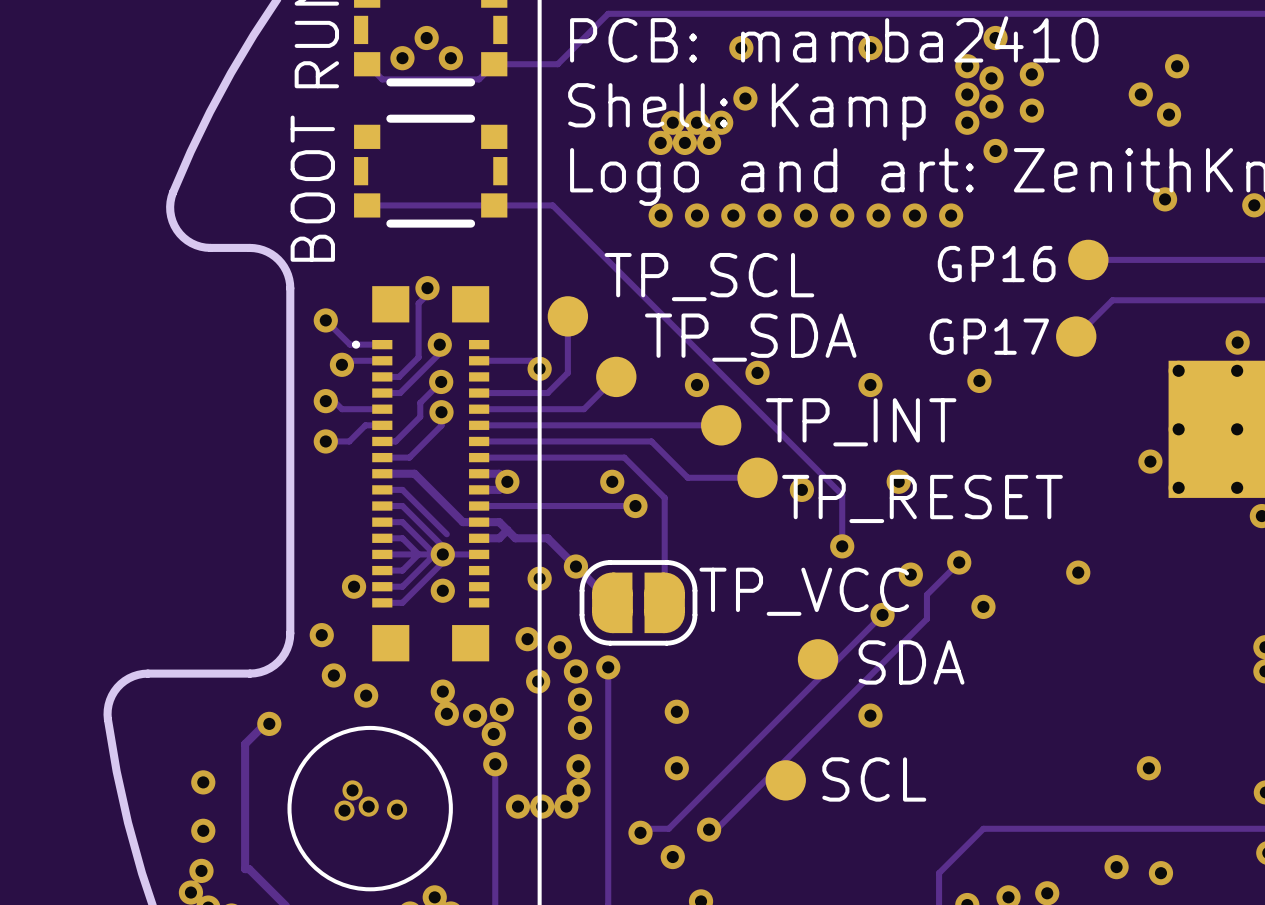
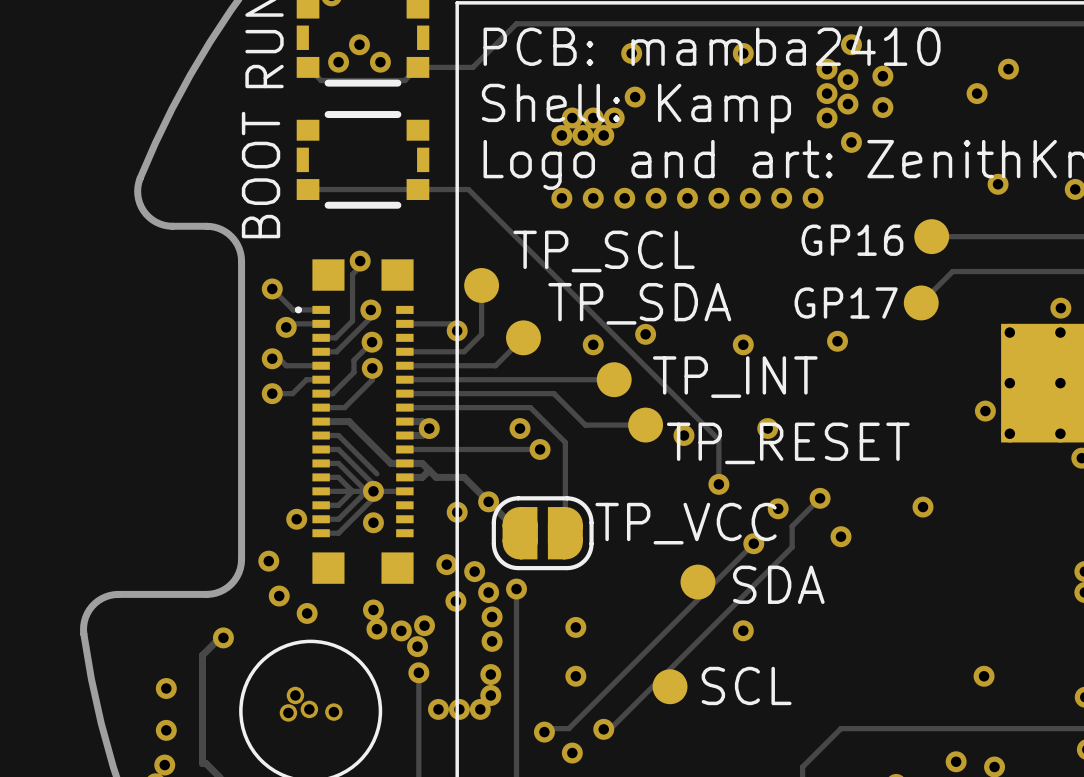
via: (1169, 114) -> none

